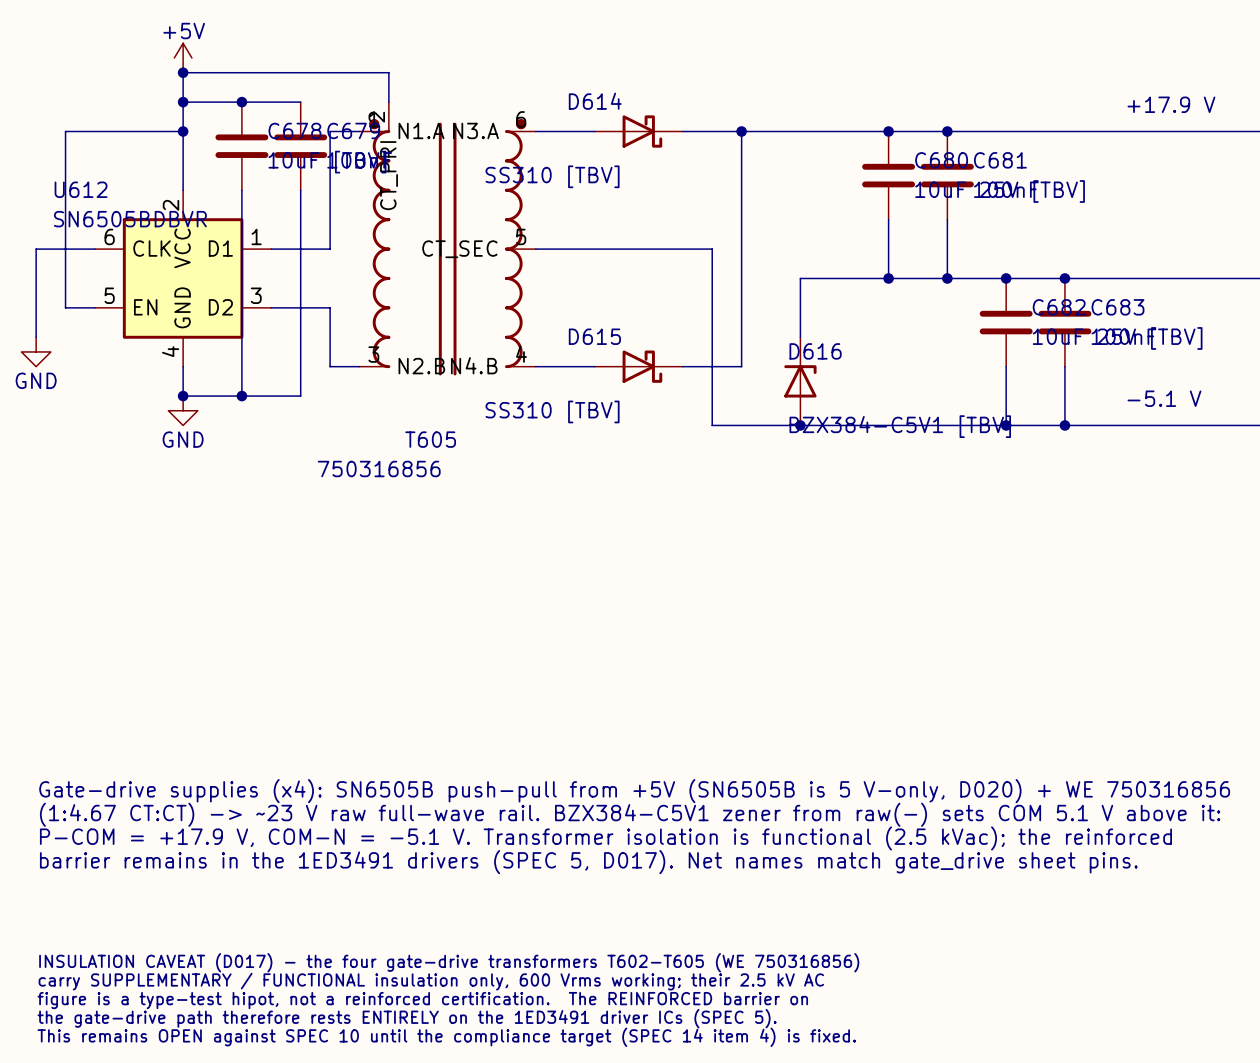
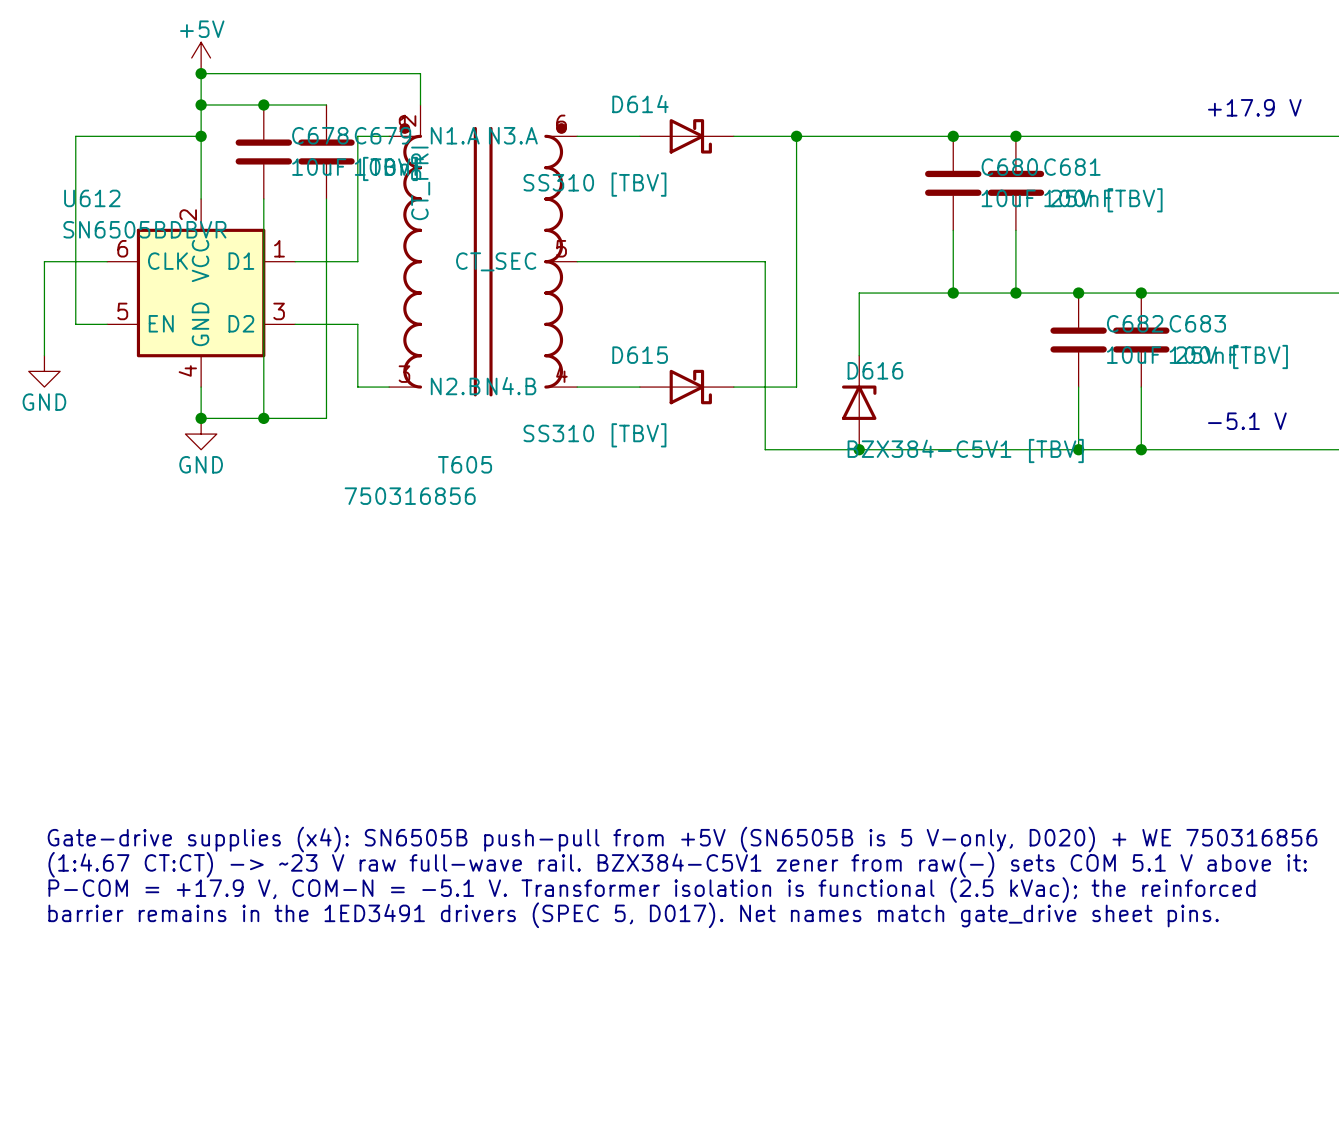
text: INSULATION CAVEAT (D017) - the four gate-drive transformers T602-T605 (WE 750316856) (449, 962) -> none
text: carry SUPPLEMENTARY / FUNCTIONAL insulation only, 600 Vrms working; their 2.5 kV AC (431, 981) -> none
text: figure is a type-test hipot, not a reinforced certification. The REINFORCED barrier on (422, 1000) -> none
text: the gate-drive path therefore rests ENTIRELY on the 1ED3491 driver ICs (SPEC 5). (407, 1018) -> none
text: This remains OPEN against SPEC 10 until the compliance target (SPEC 14 item 4) is fixed. (446, 1037) -> none

